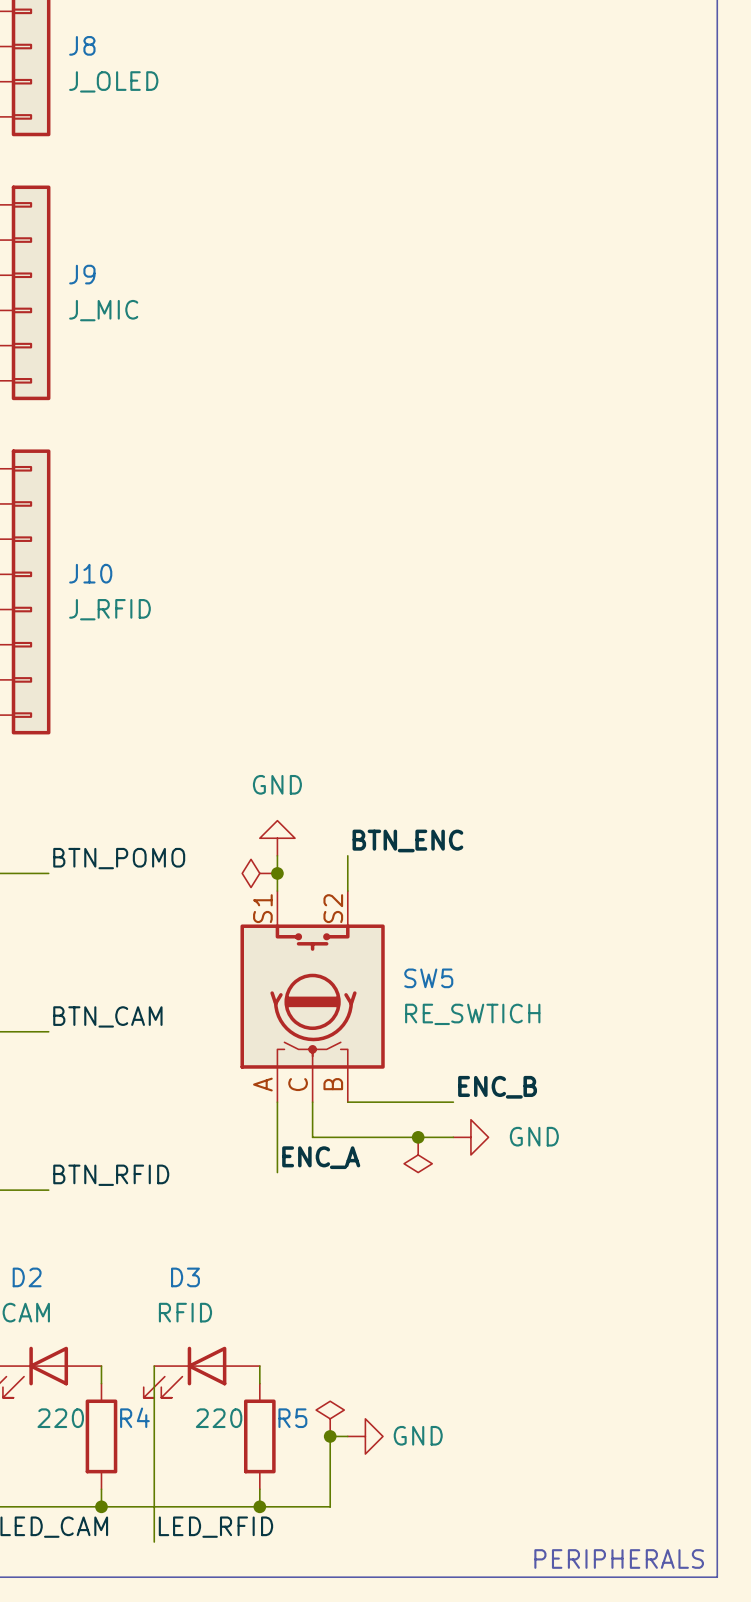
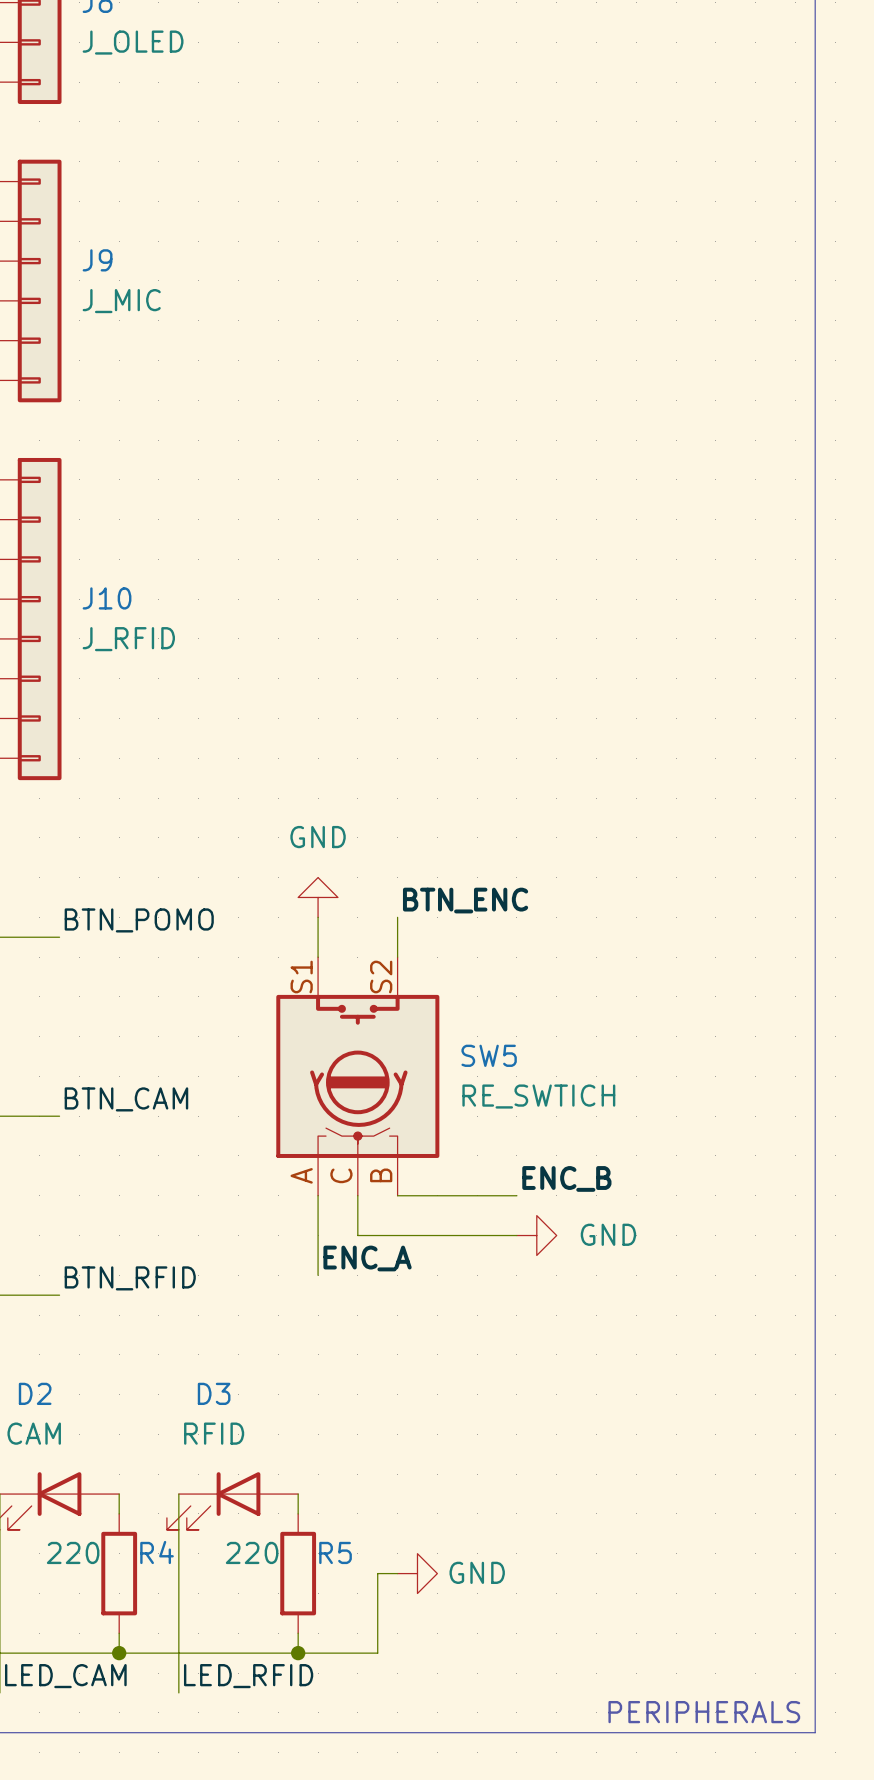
power symbol: (259, 873) -> none
junction: (277, 873) -> none
junction: (418, 1137) -> none
power symbol: (418, 1154) -> none
power symbol: (330, 1418) -> none
junction: (330, 1436) -> none

